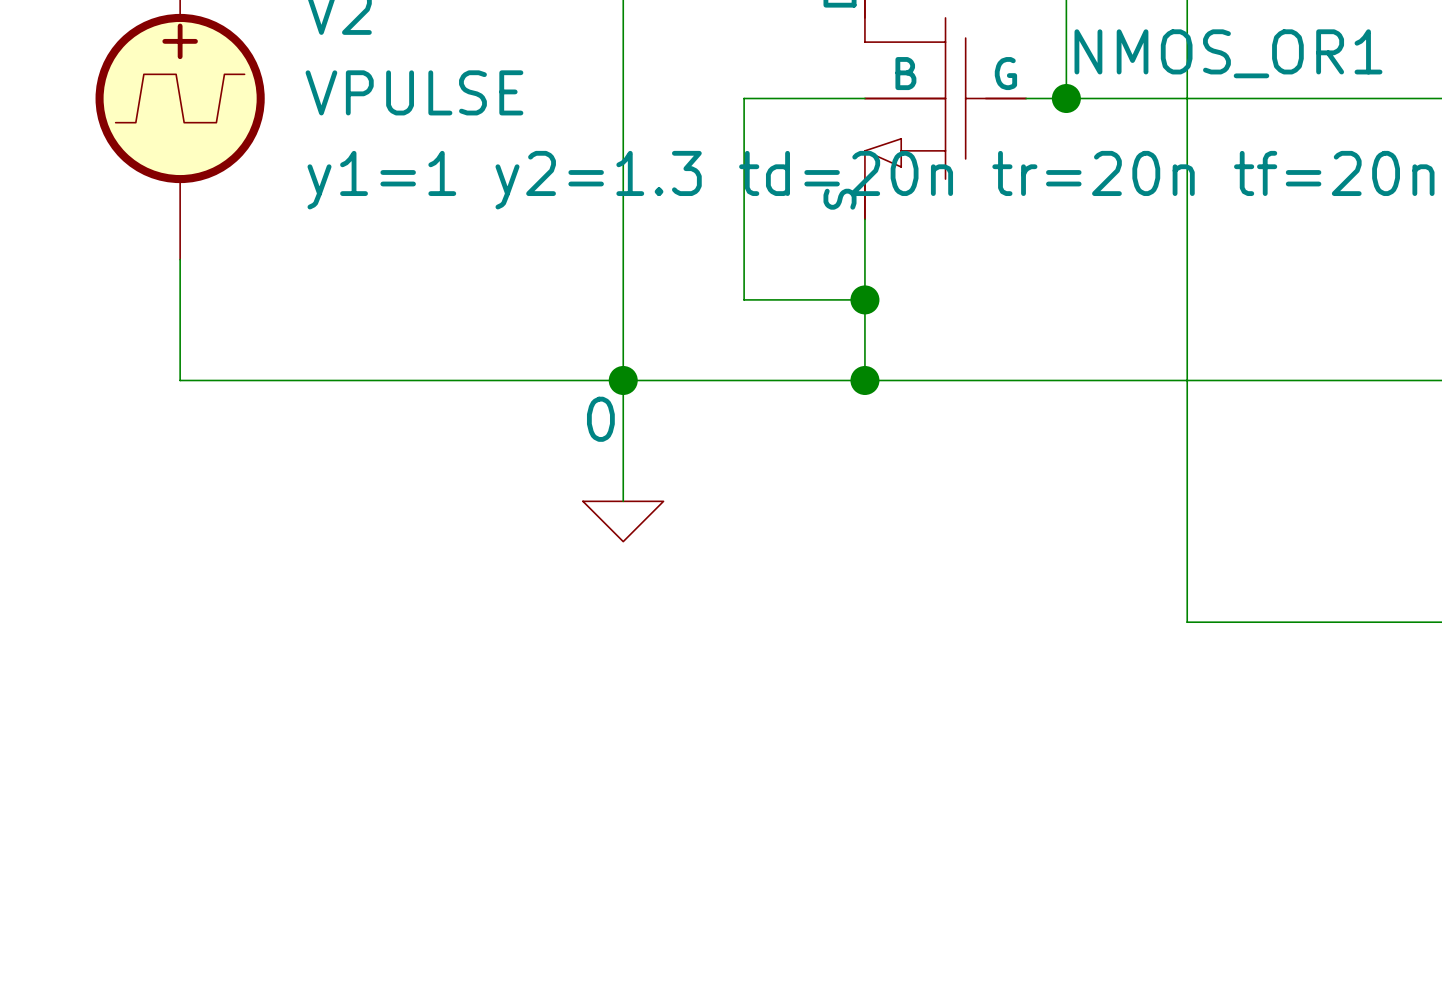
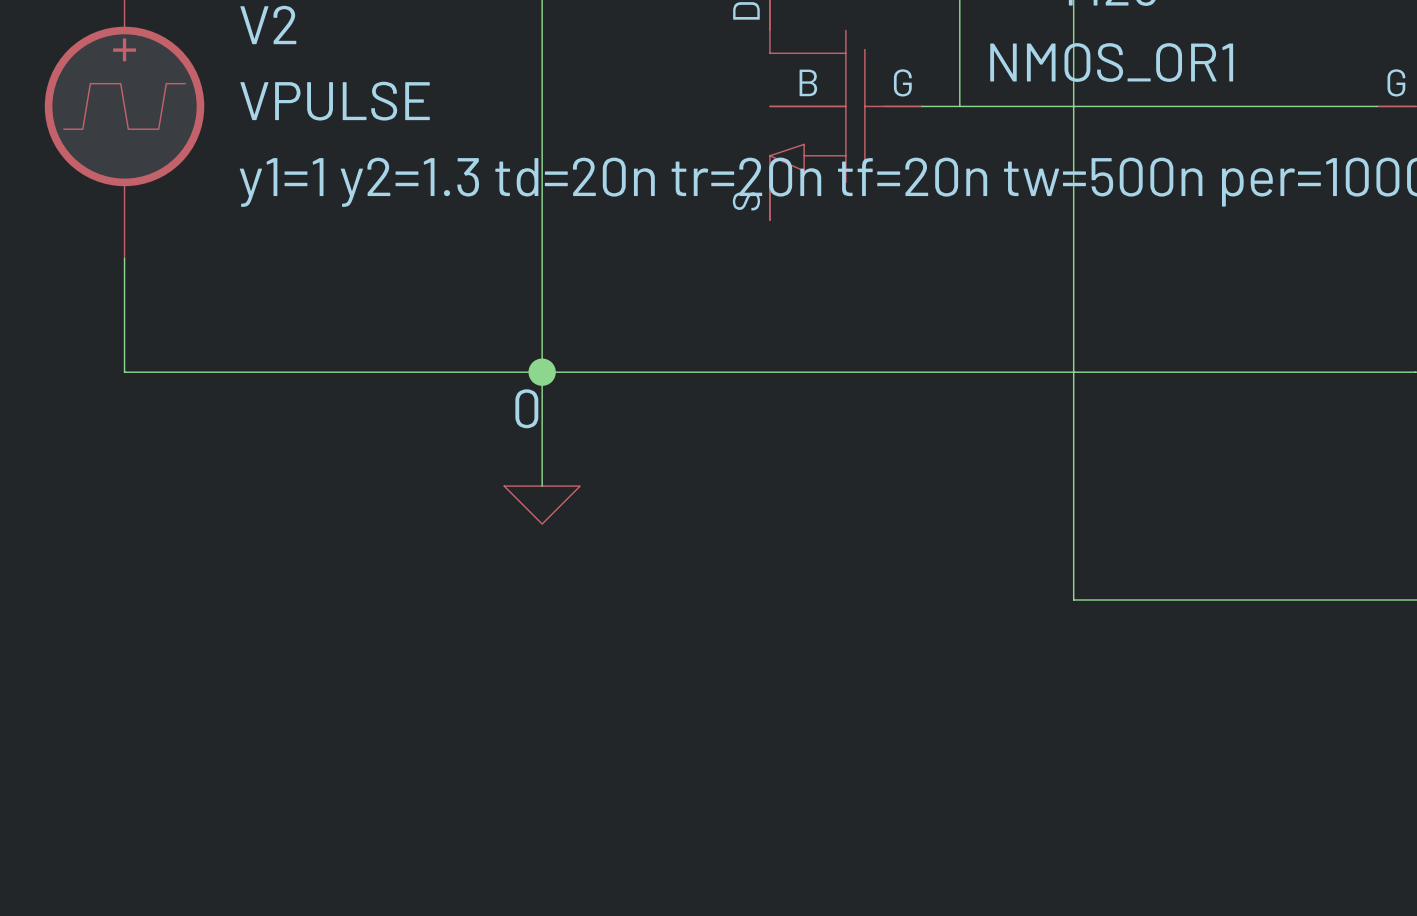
wire: (864, 98) (744, 98) (744, 299) (864, 299) -> none
junction: (1066, 98) -> none
wire: (864, 219) (864, 380) -> none
junction: (864, 299) -> none
junction: (864, 380) -> none

